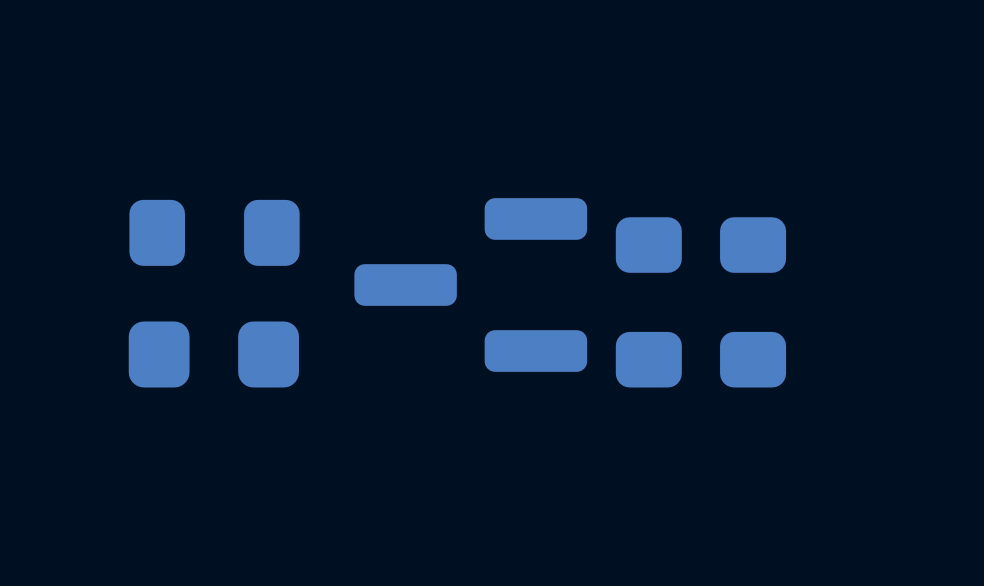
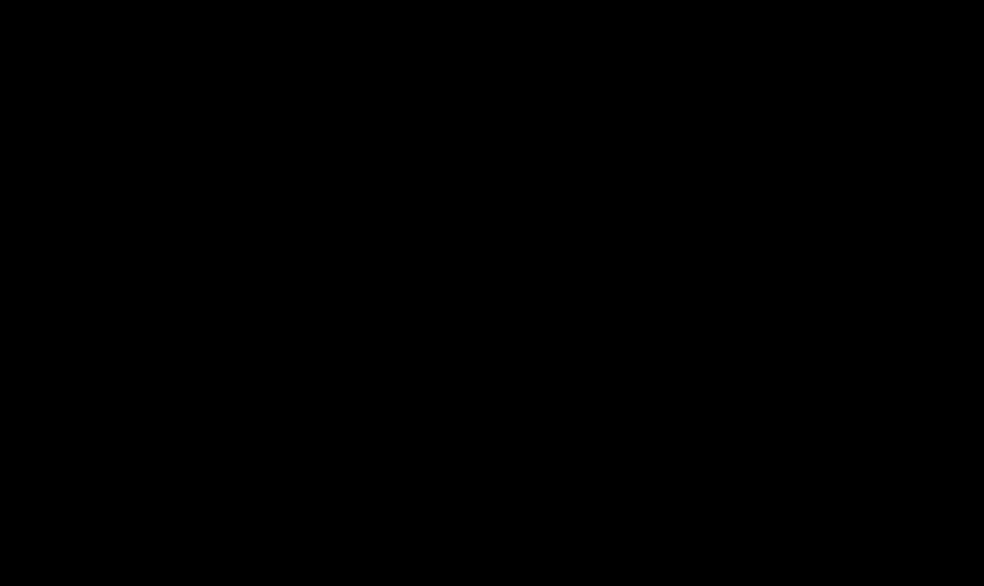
part: (214, 232) -> none
part: (470, 284) -> none
part: (648, 302) -> none
part: (753, 302) -> none
part: (213, 354) -> none

